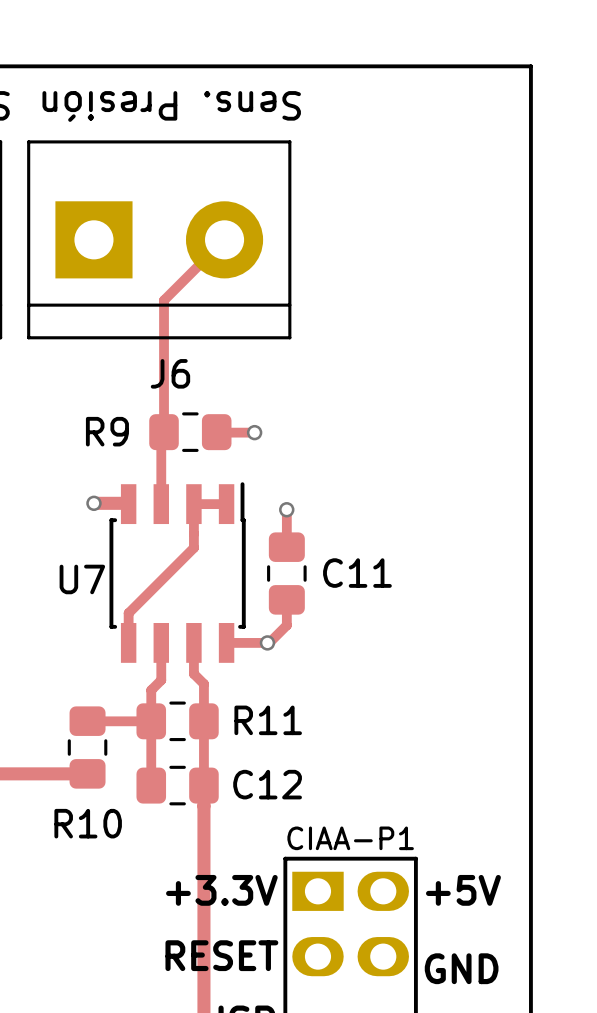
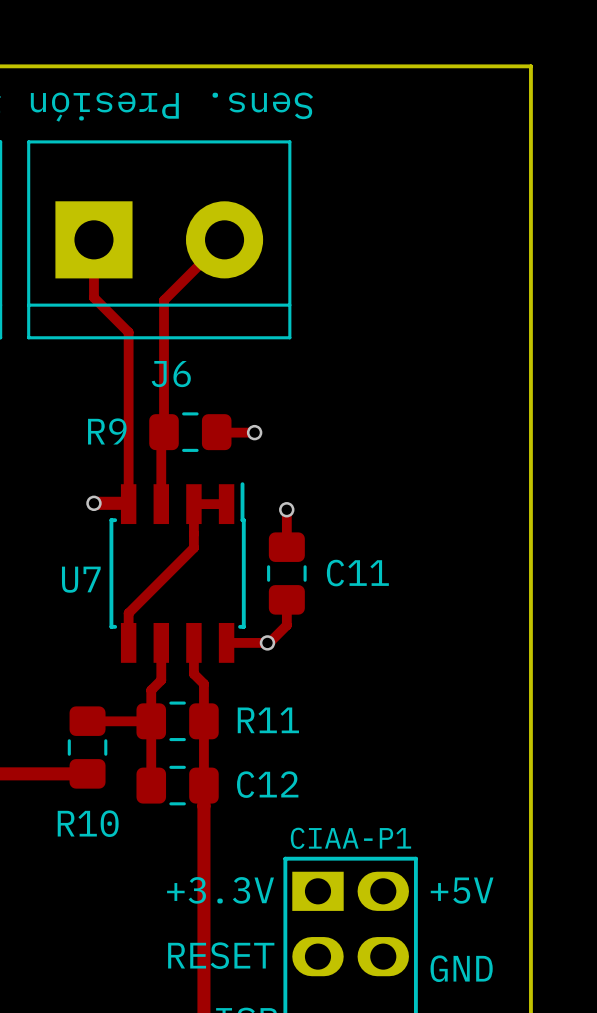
track: none -> (93, 239) (93, 297) (128, 332) (127, 503)

